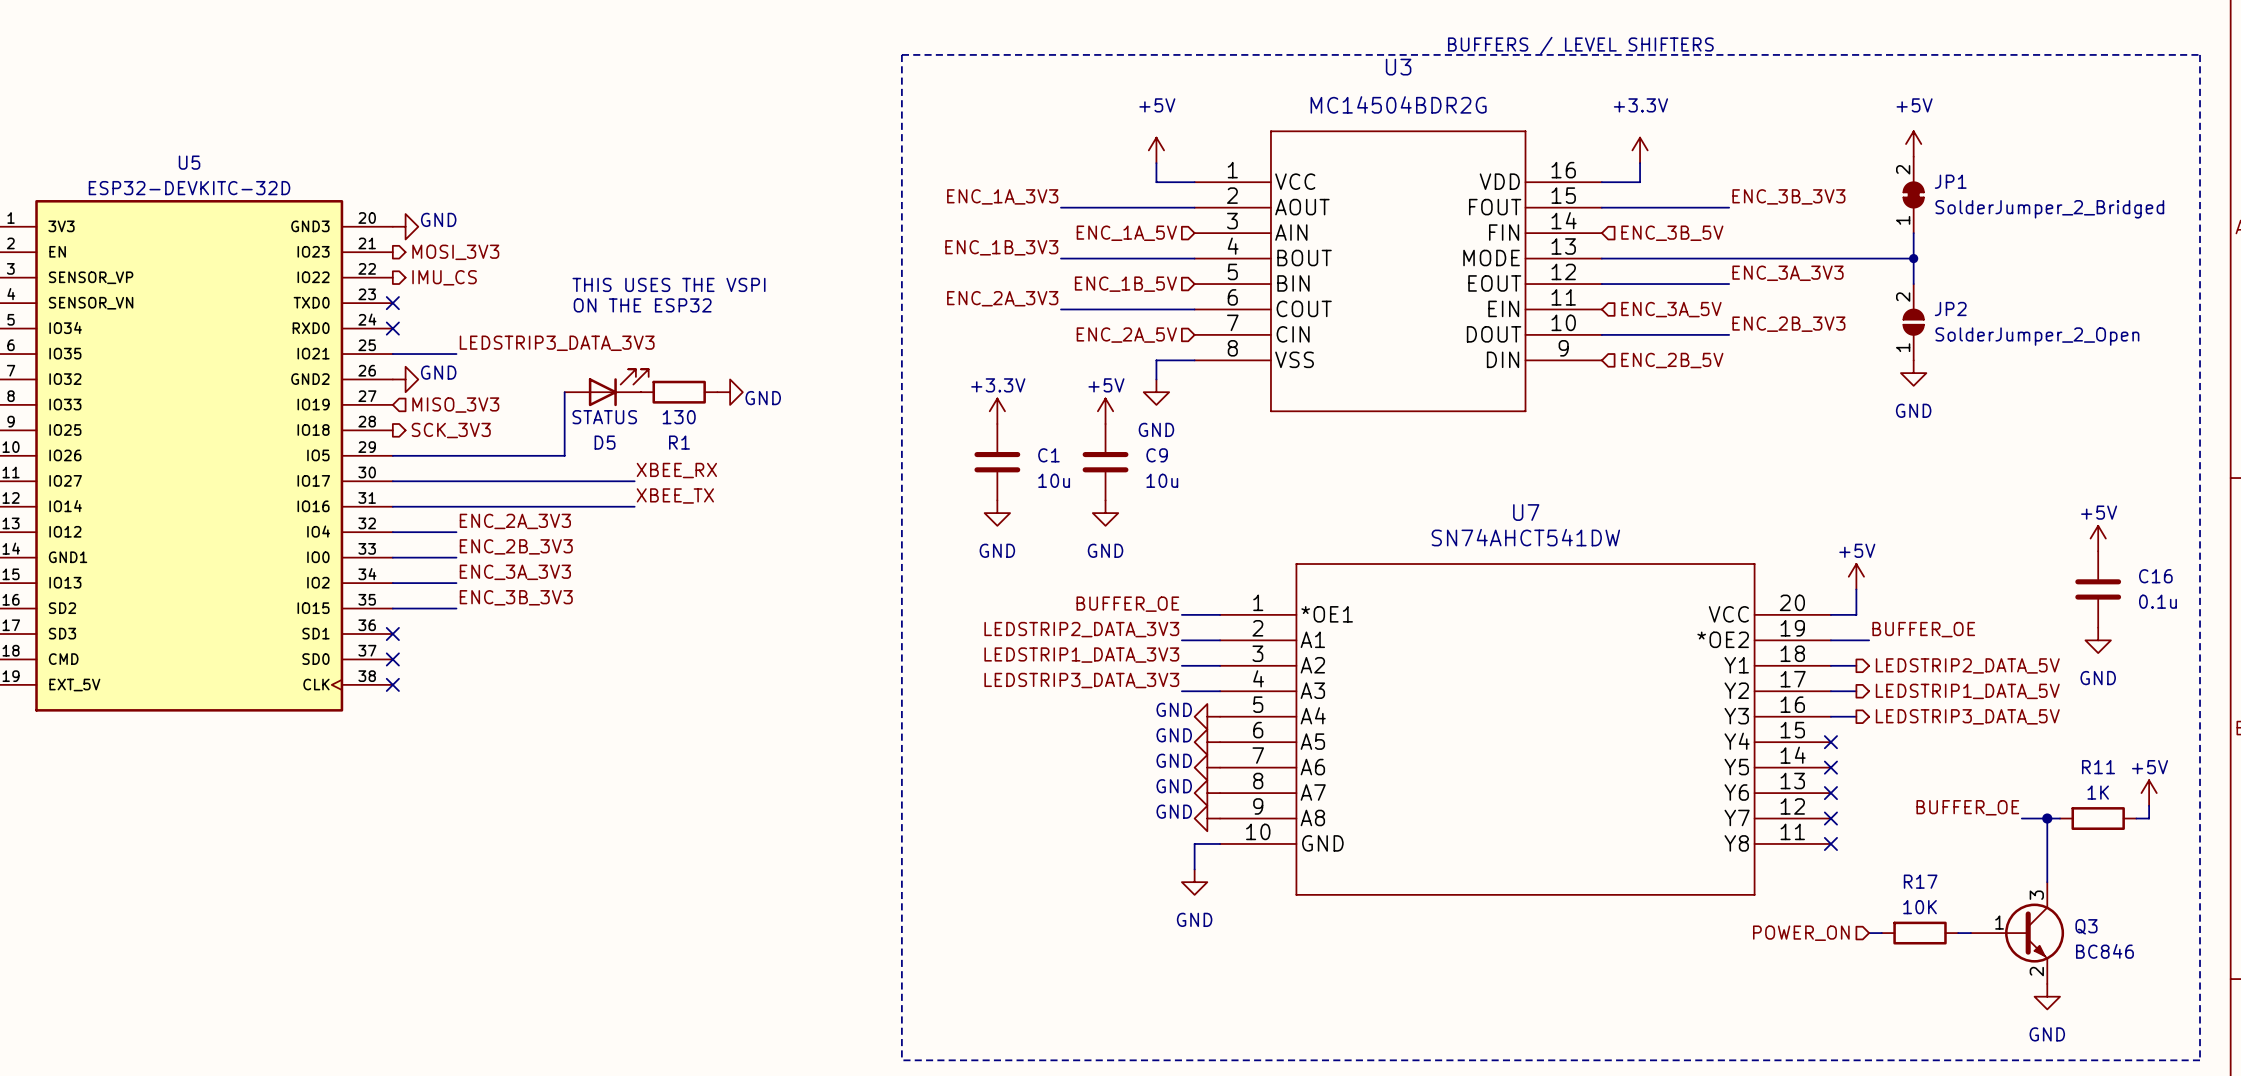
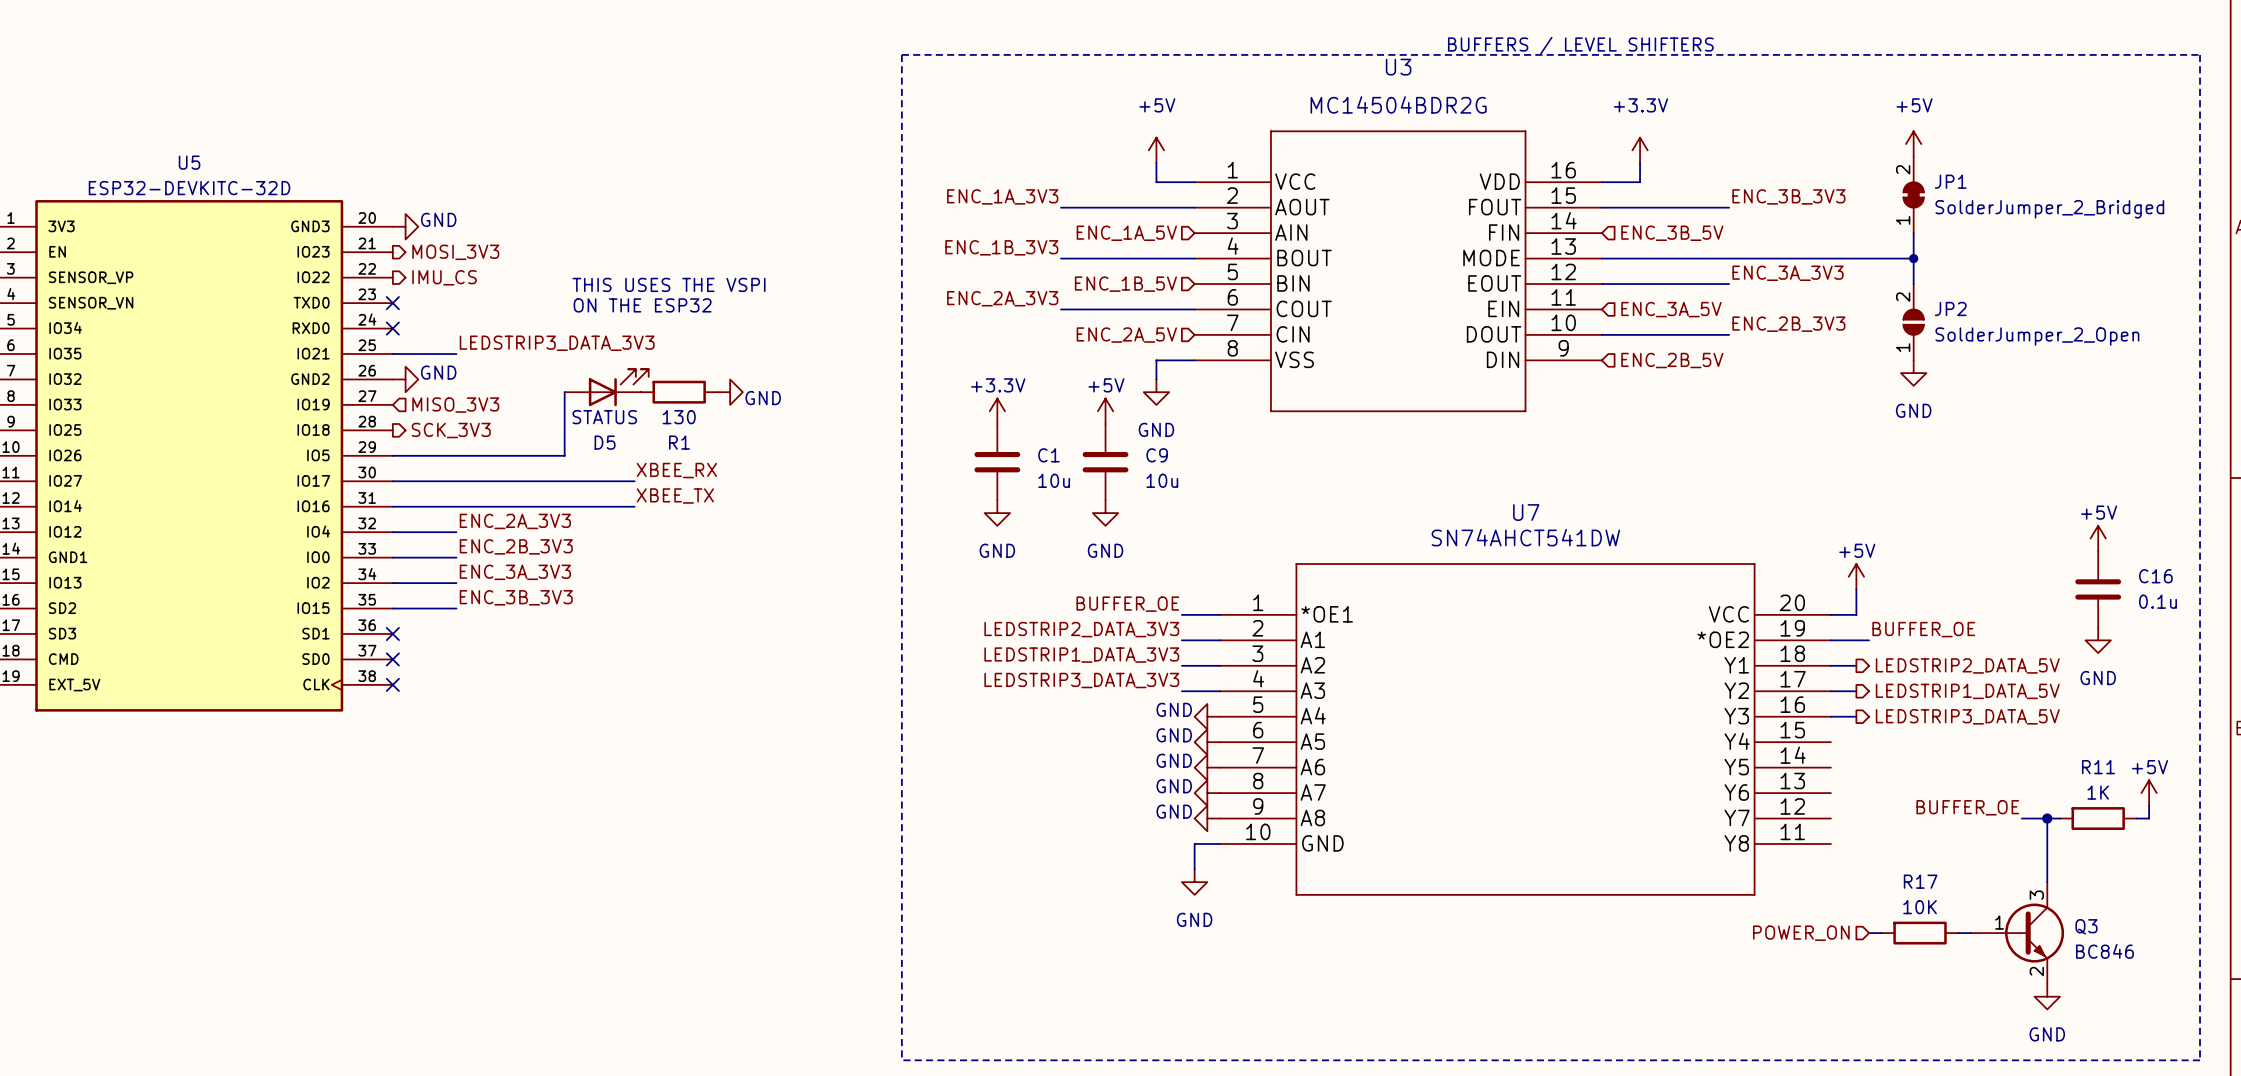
no-connect mark: (1830, 742) -> none
no-connect mark: (1830, 767) -> none
no-connect mark: (1830, 793) -> none
no-connect mark: (1830, 818) -> none
no-connect mark: (1830, 843) -> none

